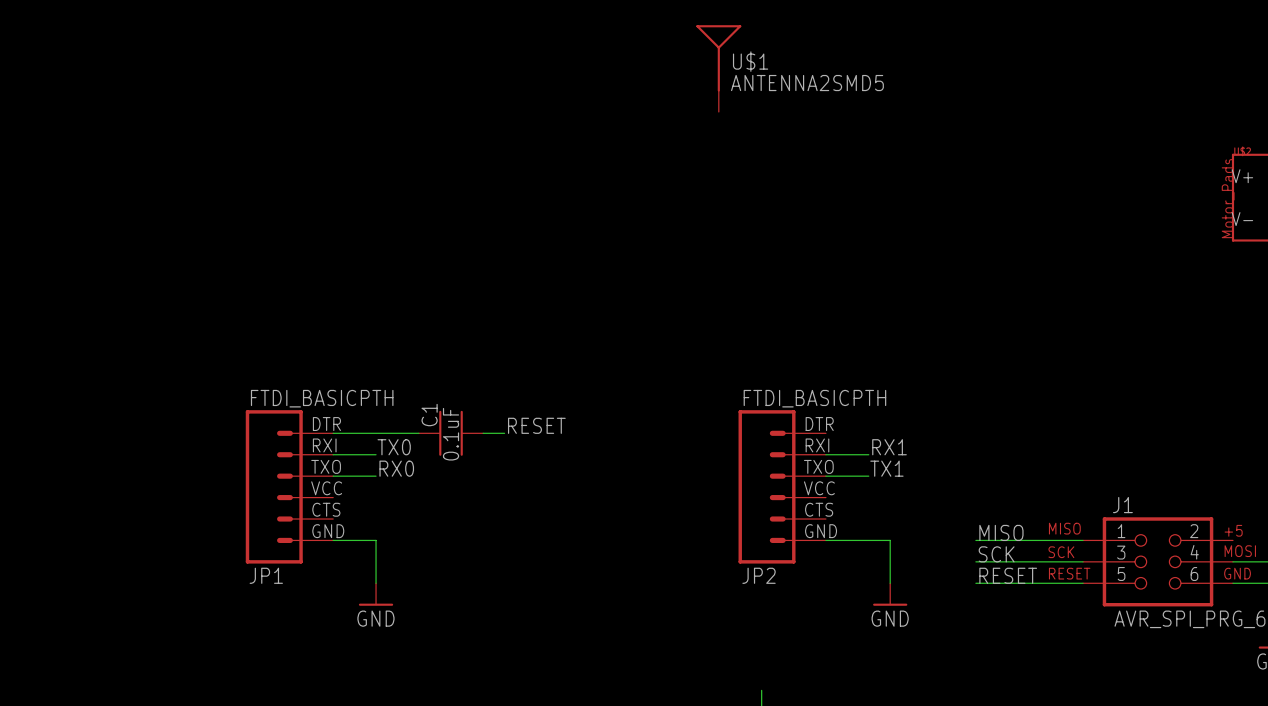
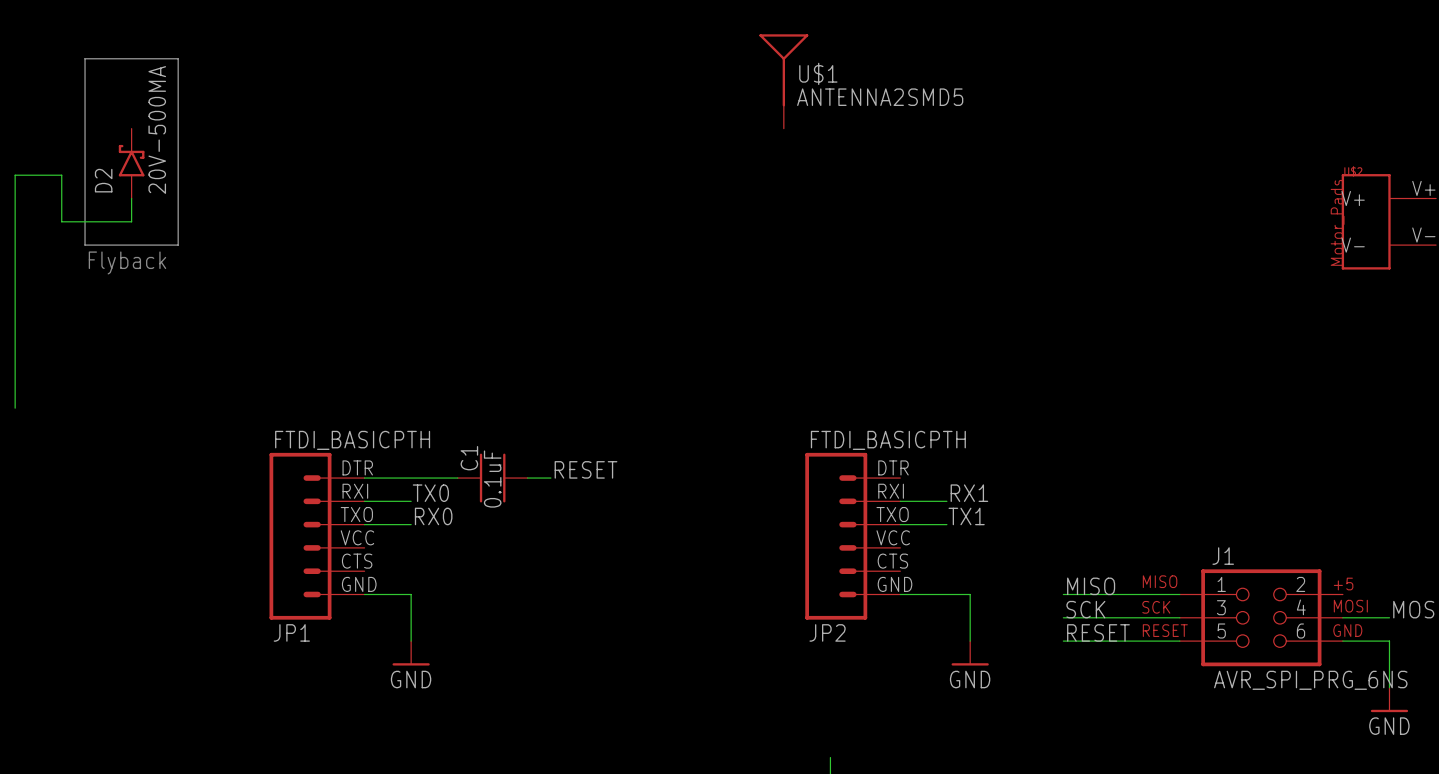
line: none -> (85, 58) (85, 245) (178, 245) (178, 58) (85, 58)
D2: none -> 20V-500MA (131, 163)
wire: none -> (131, 198) (131, 221) (61, 221) (61, 175) (15, 175) (15, 408)
text: none -> Flyback (127, 262)

